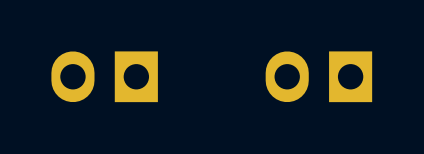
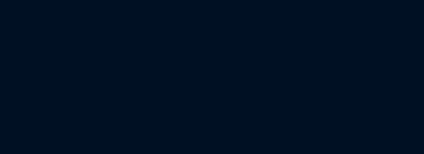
part: (104, 76) -> none
part: (318, 76) -> none

